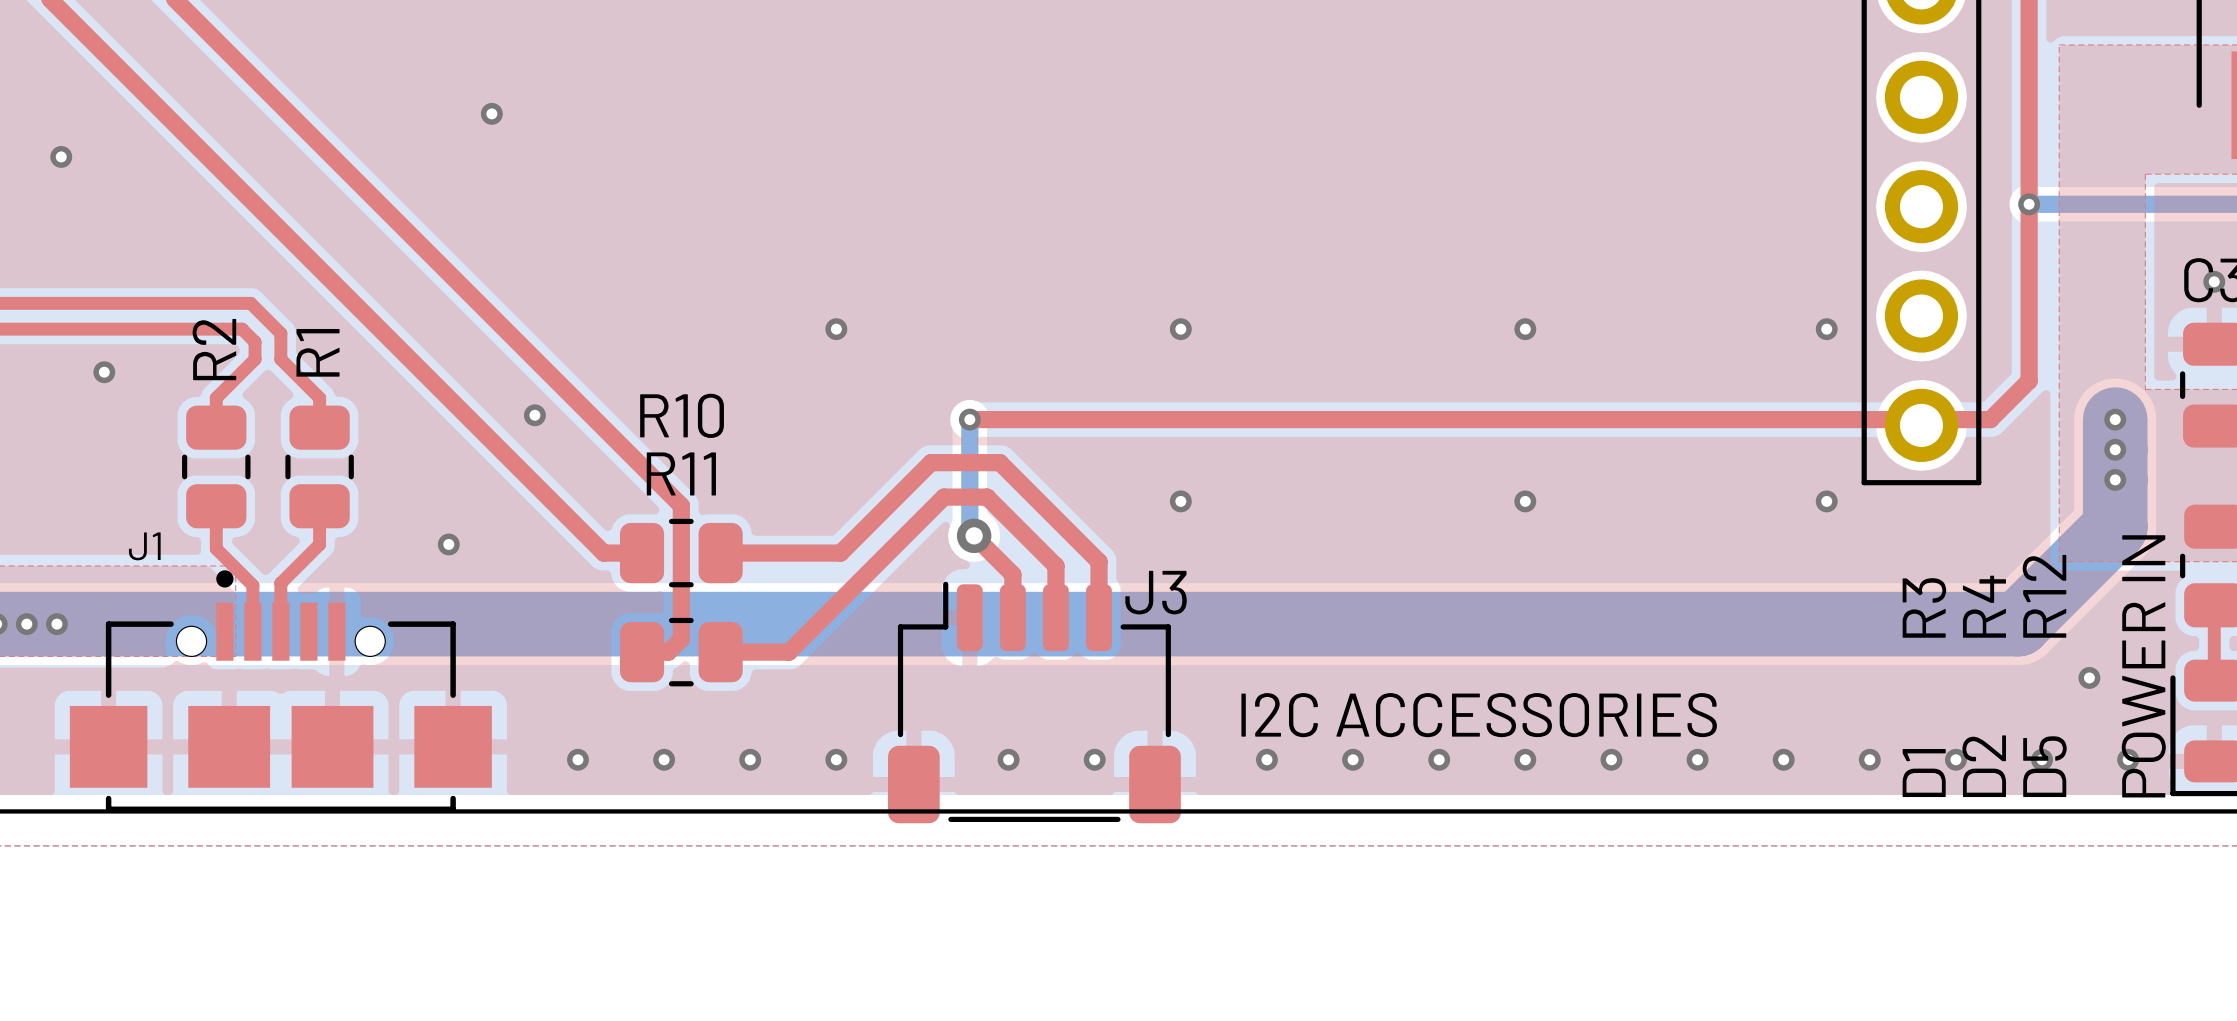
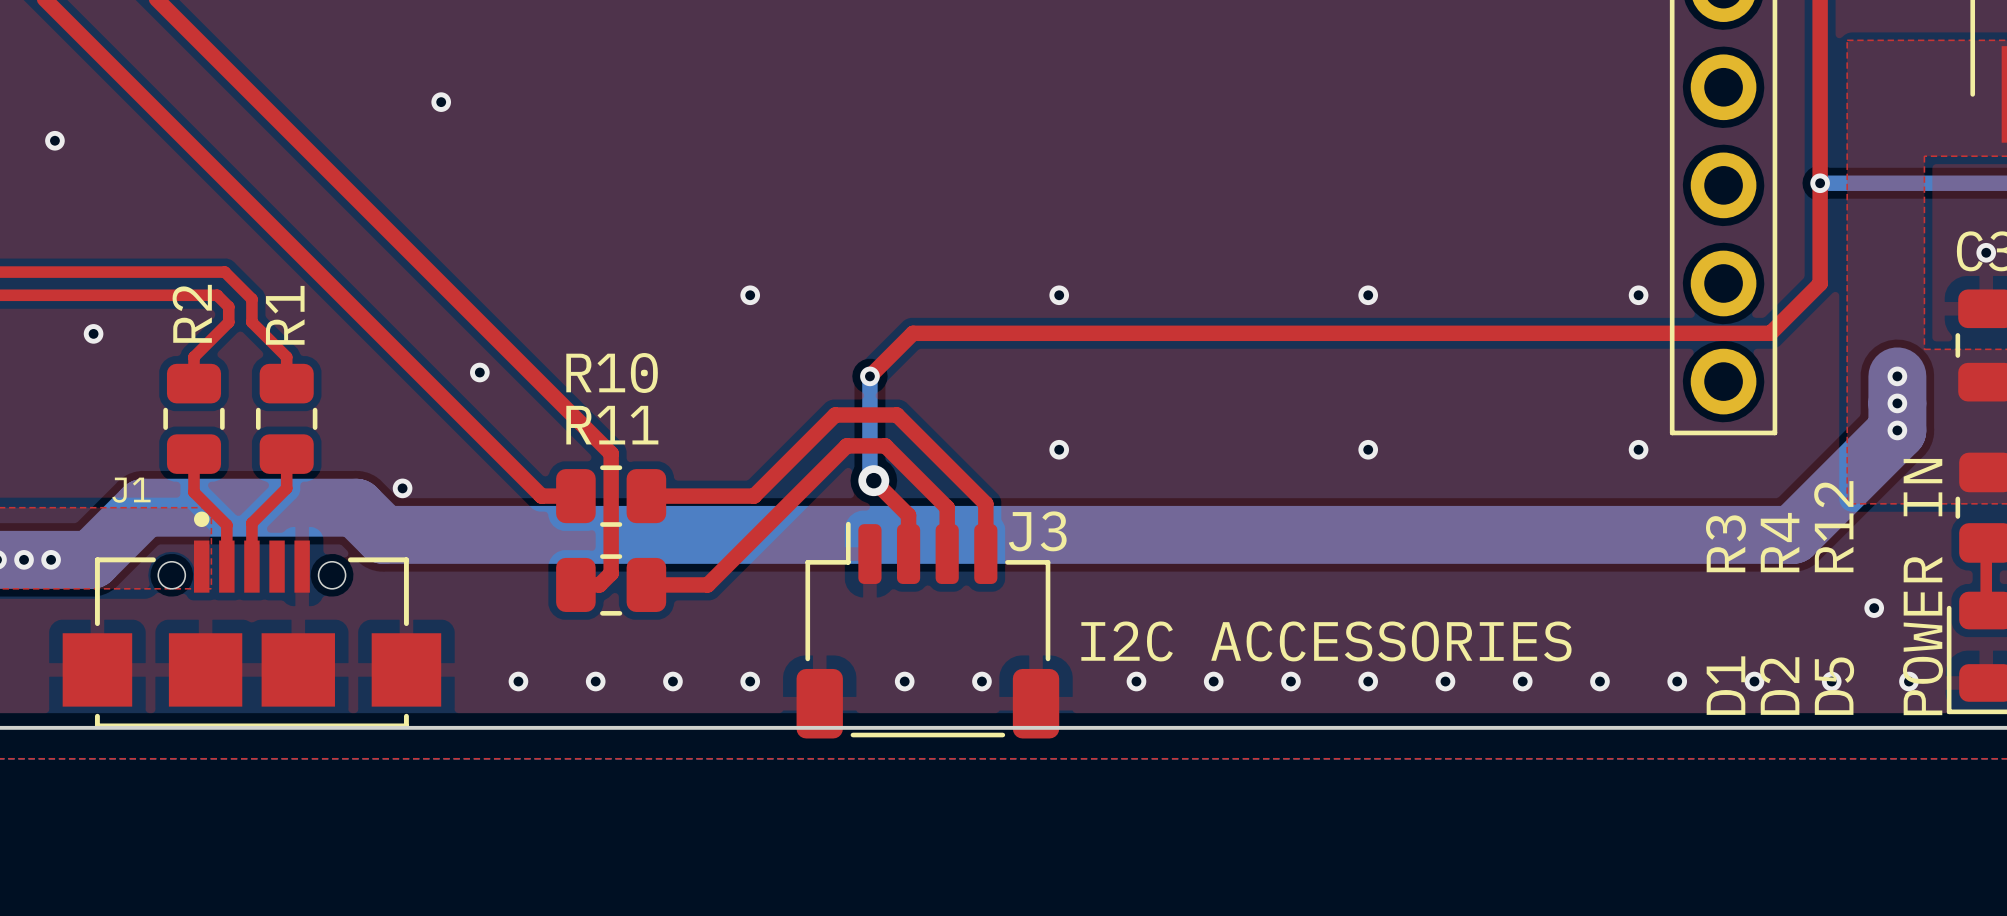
top track: (2029, 316) (2029, 380) (1990, 419) (969, 419) -> (1820, 283) (1770, 333) (913, 333) (869, 376)
bottom track: (2115, 479) (2115, 527) (2018, 624) (102, 624) -> (1897, 430) (1792, 534) (383, 534) (356, 507) (143, 507) (91, 559)

